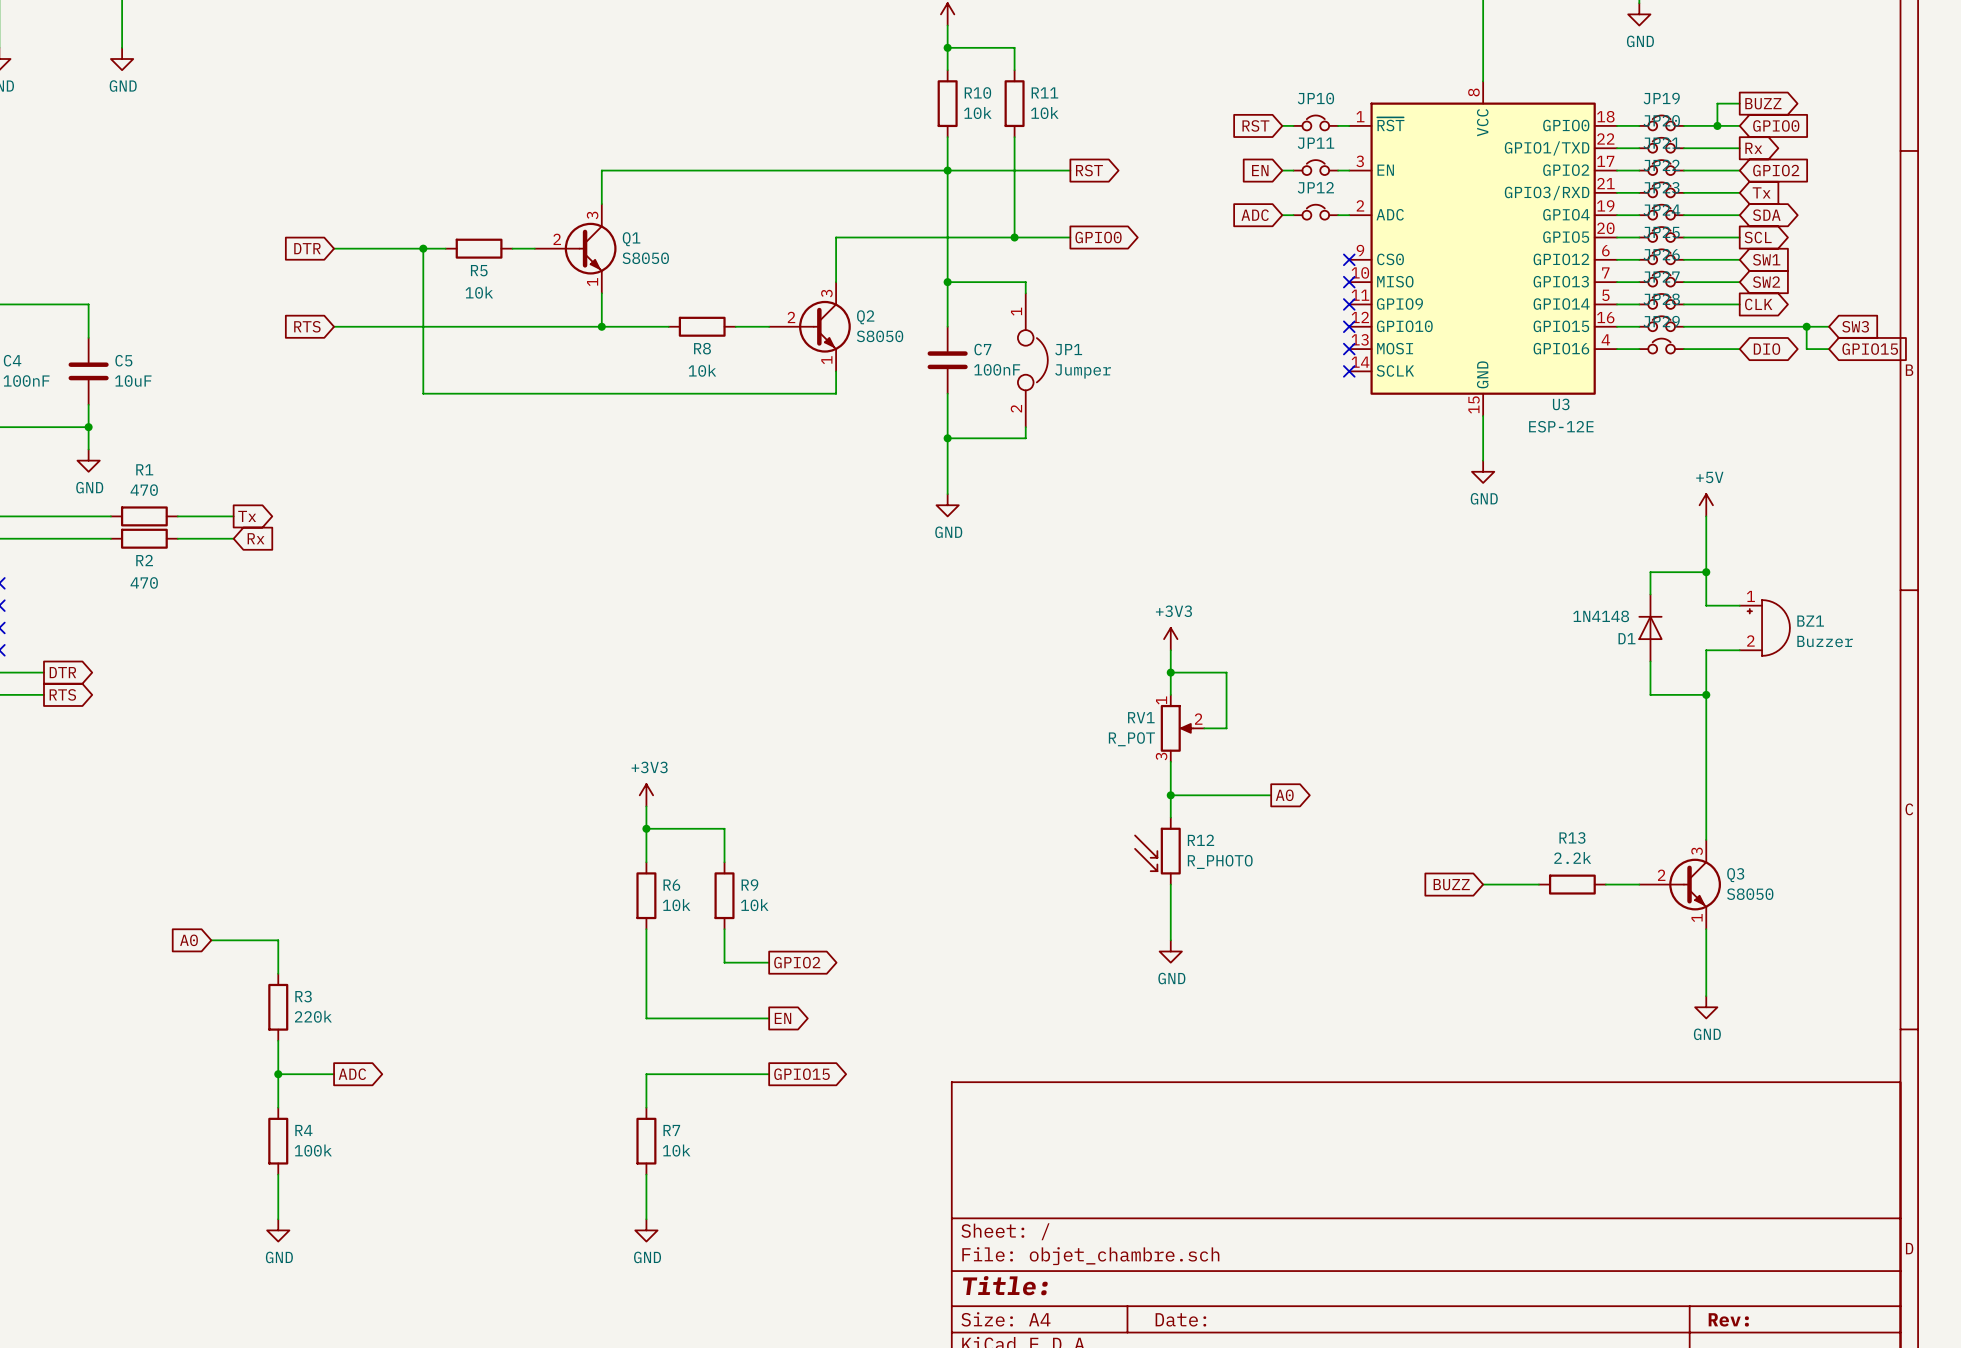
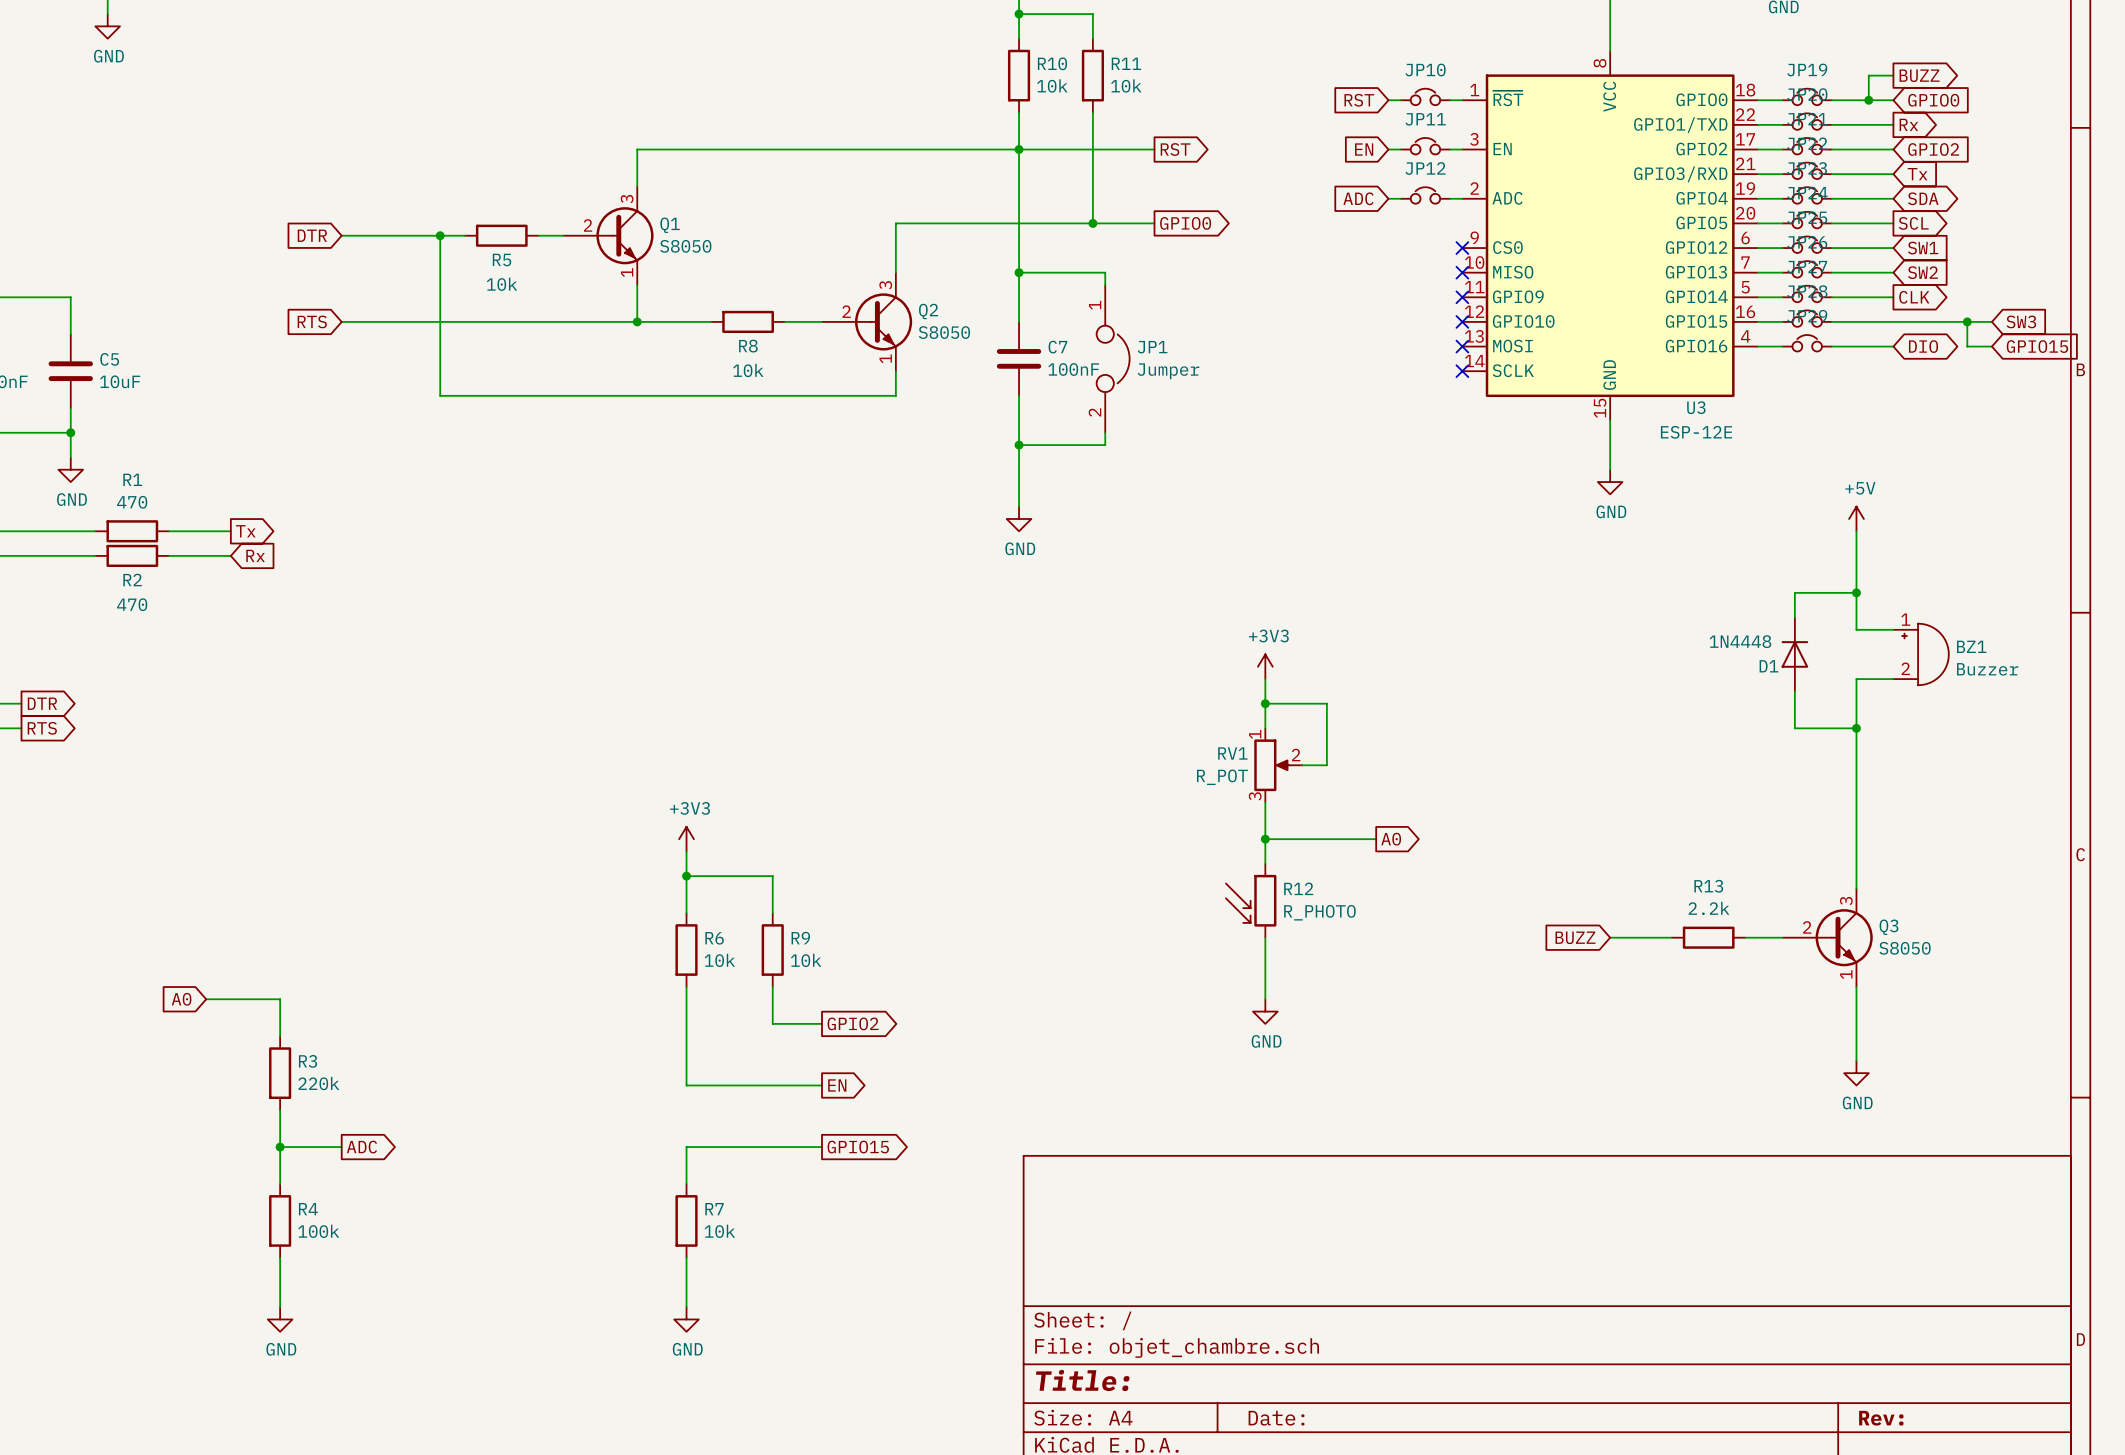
D1 value: 1N4148 (1601, 616) -> 1N4448 (1740, 641)

